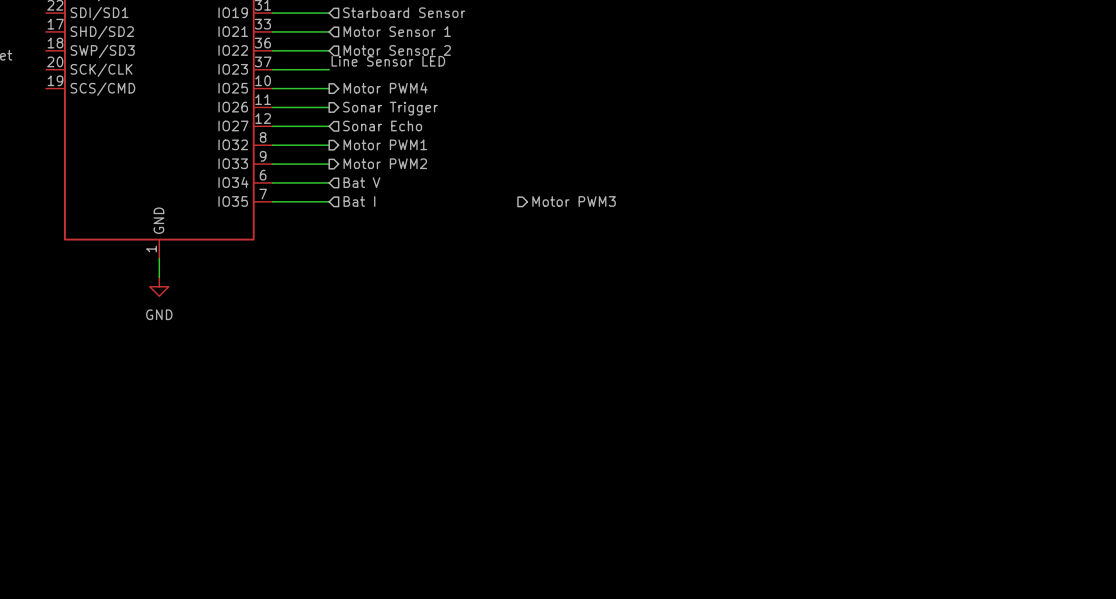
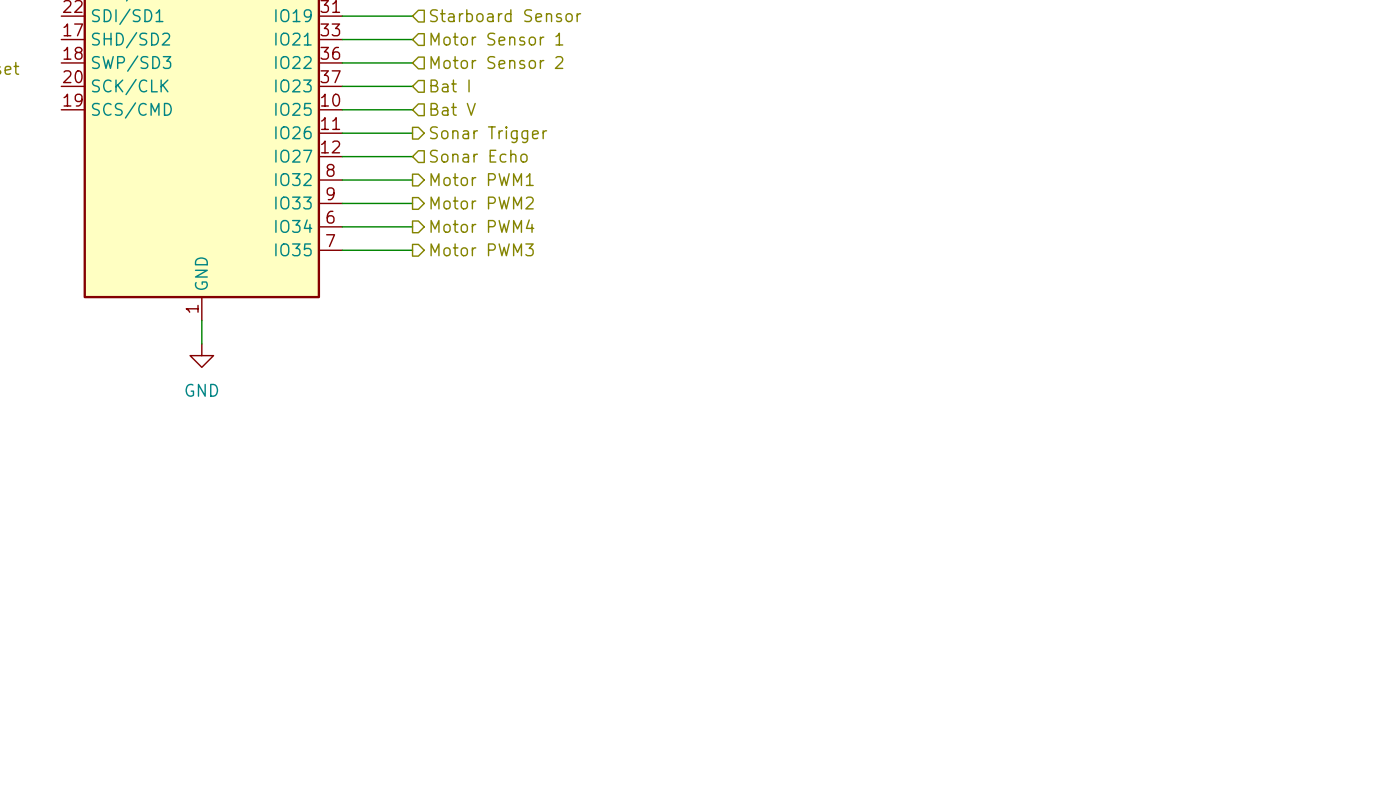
label: Line Sensor LED (388, 61) -> none
hierarchical label: none -> Bat I (450, 85)
hierarchical label shape: output (385, 88) -> input (453, 109)
hierarchical label: Motor PWM4 (385, 88) -> Bat V (453, 109)
hierarchical label shape: input (361, 182) -> output (482, 226)
hierarchical label: Bat V (361, 182) -> Motor PWM4 (482, 226)
hierarchical label shape: input (359, 201) -> output (482, 249)
hierarchical label: Bat I (359, 201) -> Motor PWM3 (482, 249)
hierarchical label: Motor PWM3 (574, 201) -> none

